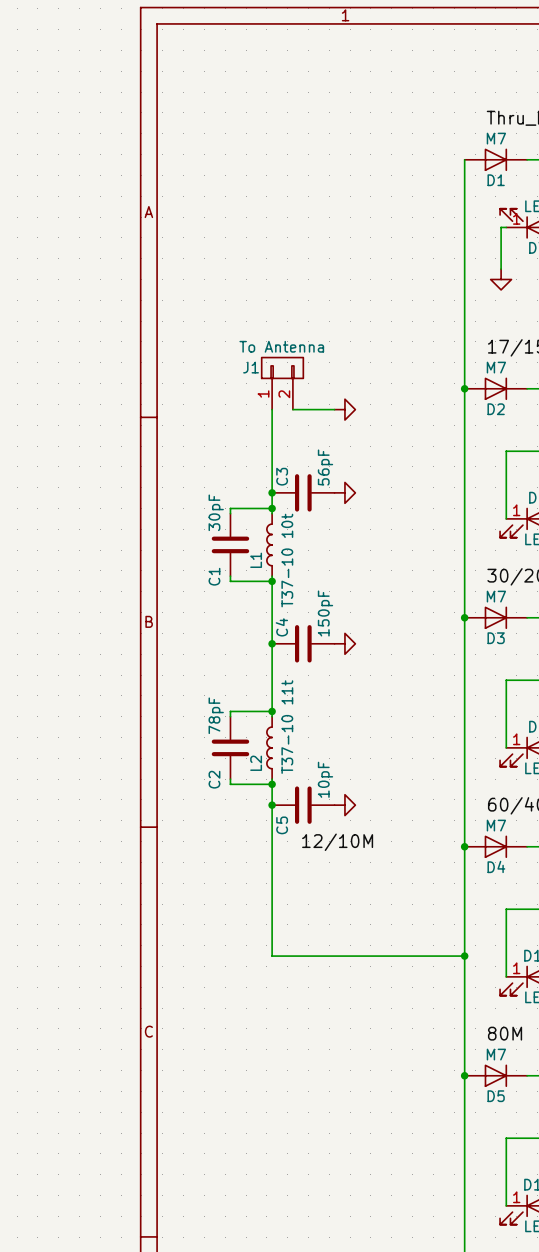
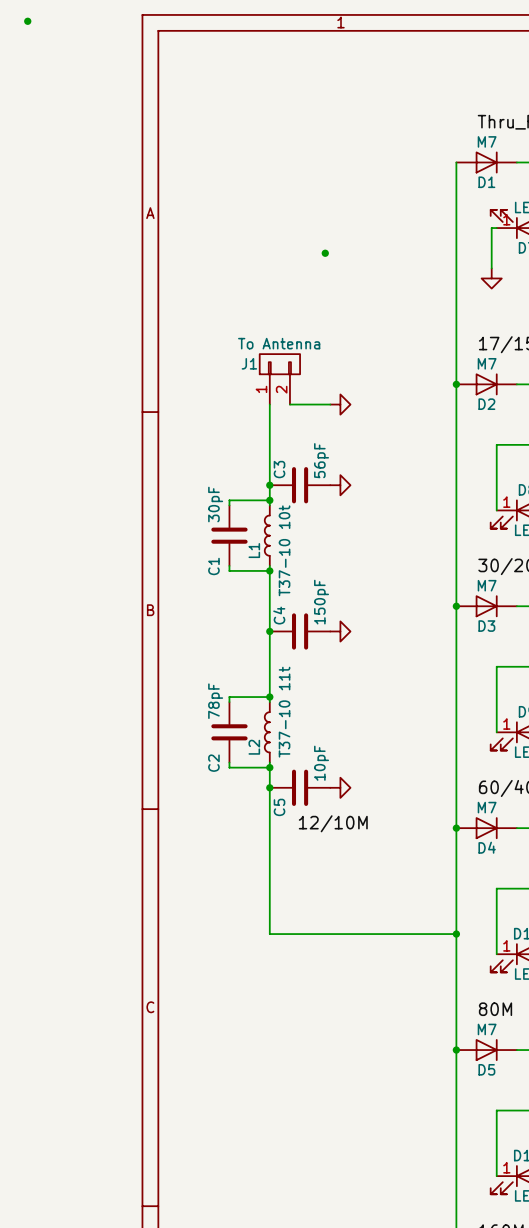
junction: none -> (27, 21)
junction: none -> (325, 253)

